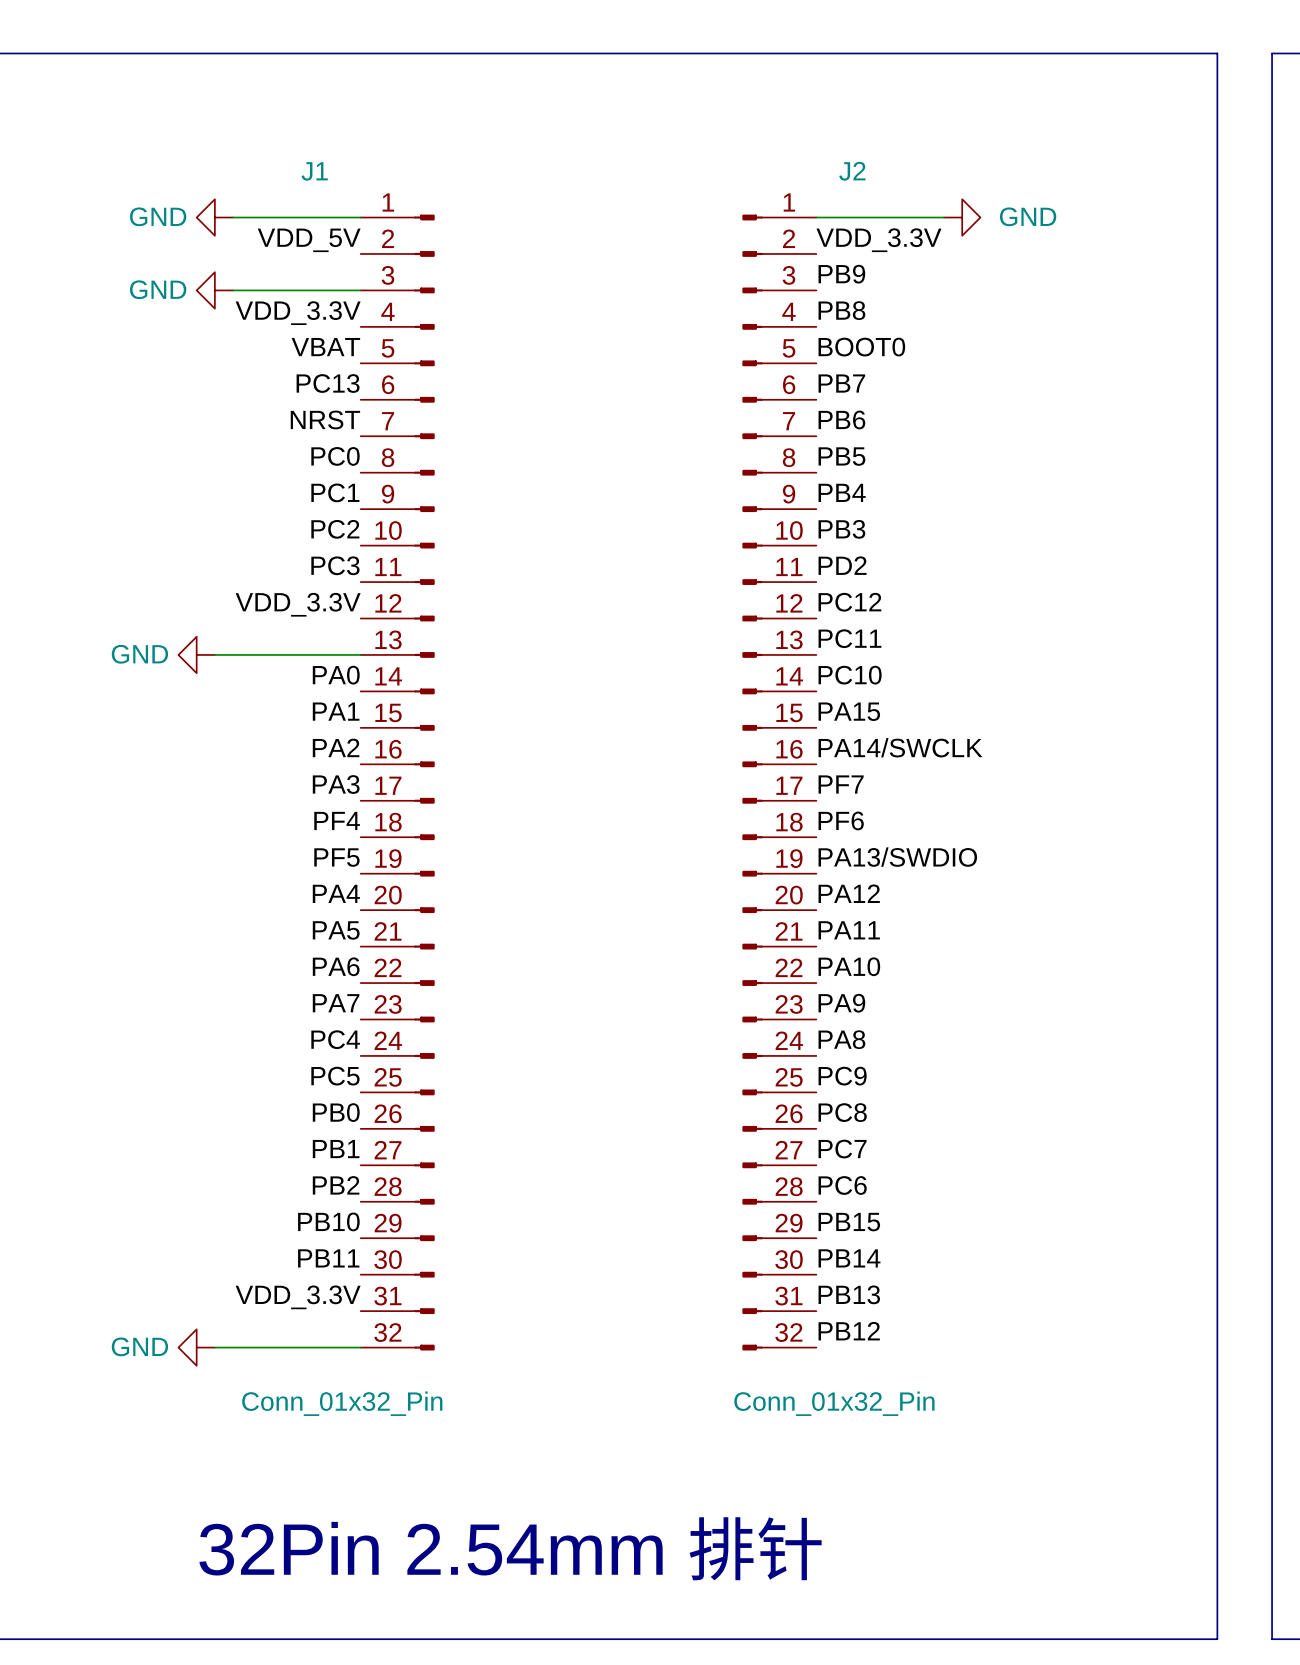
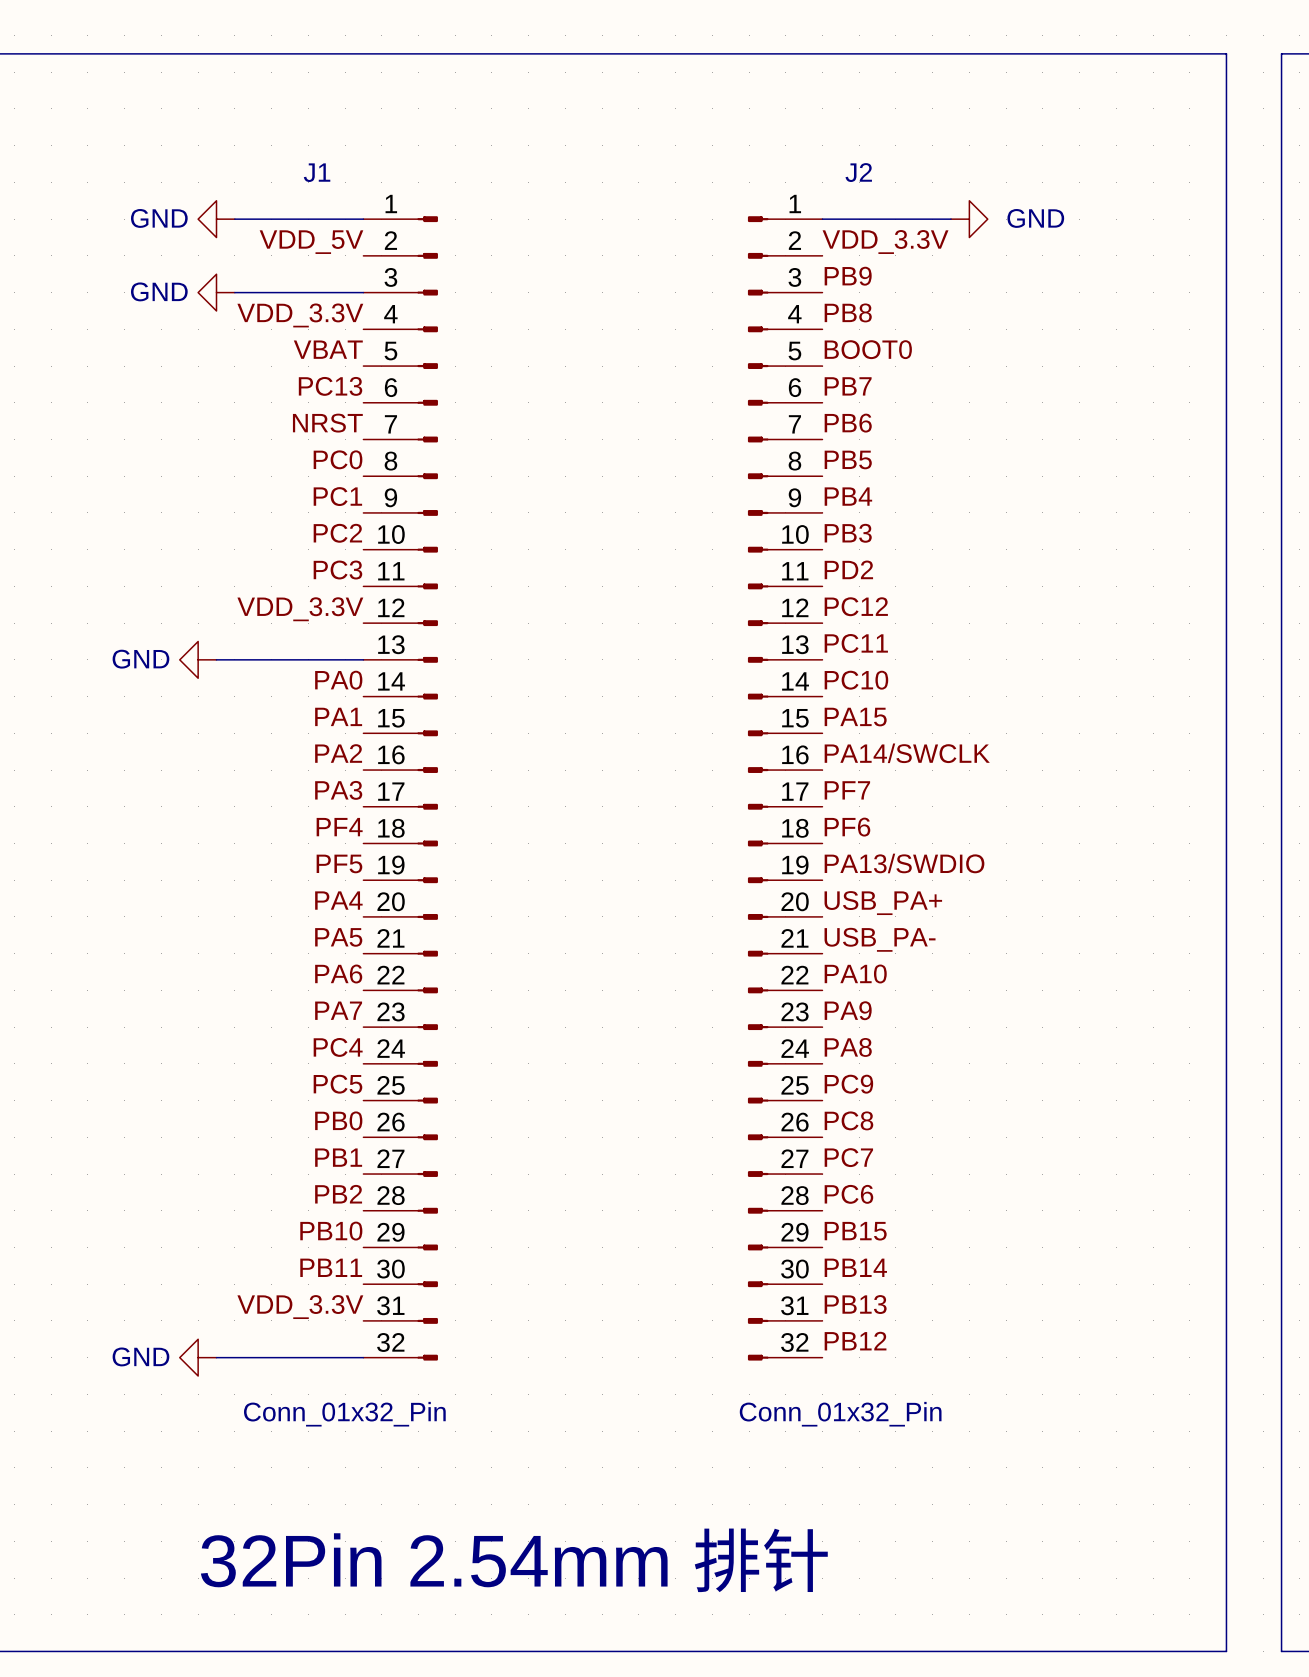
label: PA12 (849, 893) -> USB_PA+ (883, 903)
label: PA11 (849, 930) -> USB_PA- (880, 939)

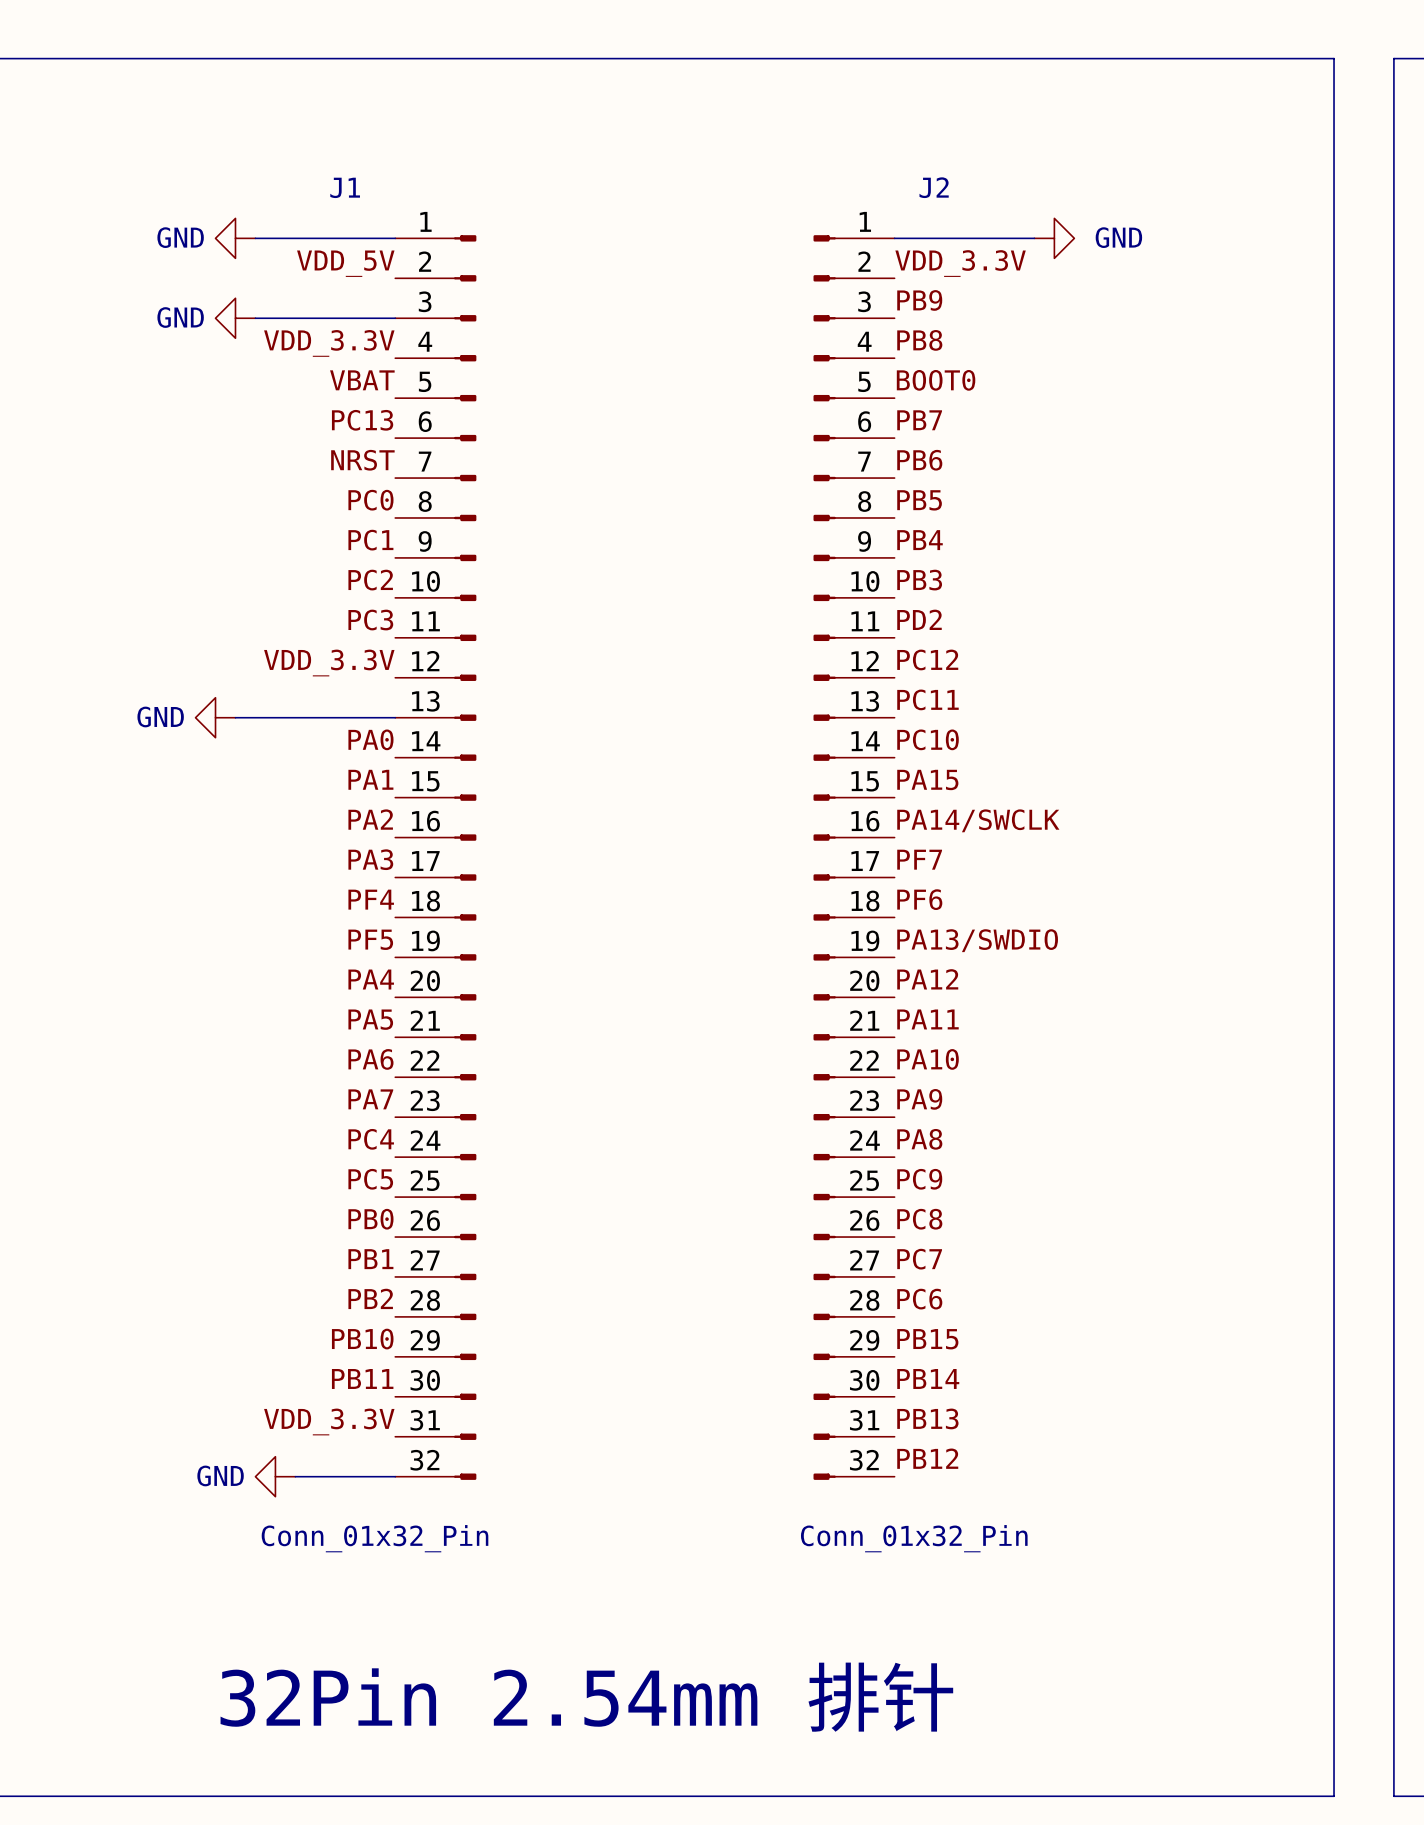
label: USB_PA+ (883, 903) -> PA12 (927, 979)
label: USB_PA- (880, 939) -> PA11 (927, 1019)
power symbol position: GND (198, 1357) -> GND (275, 1476)
wire: (216, 1357) (271, 1357) -> none

